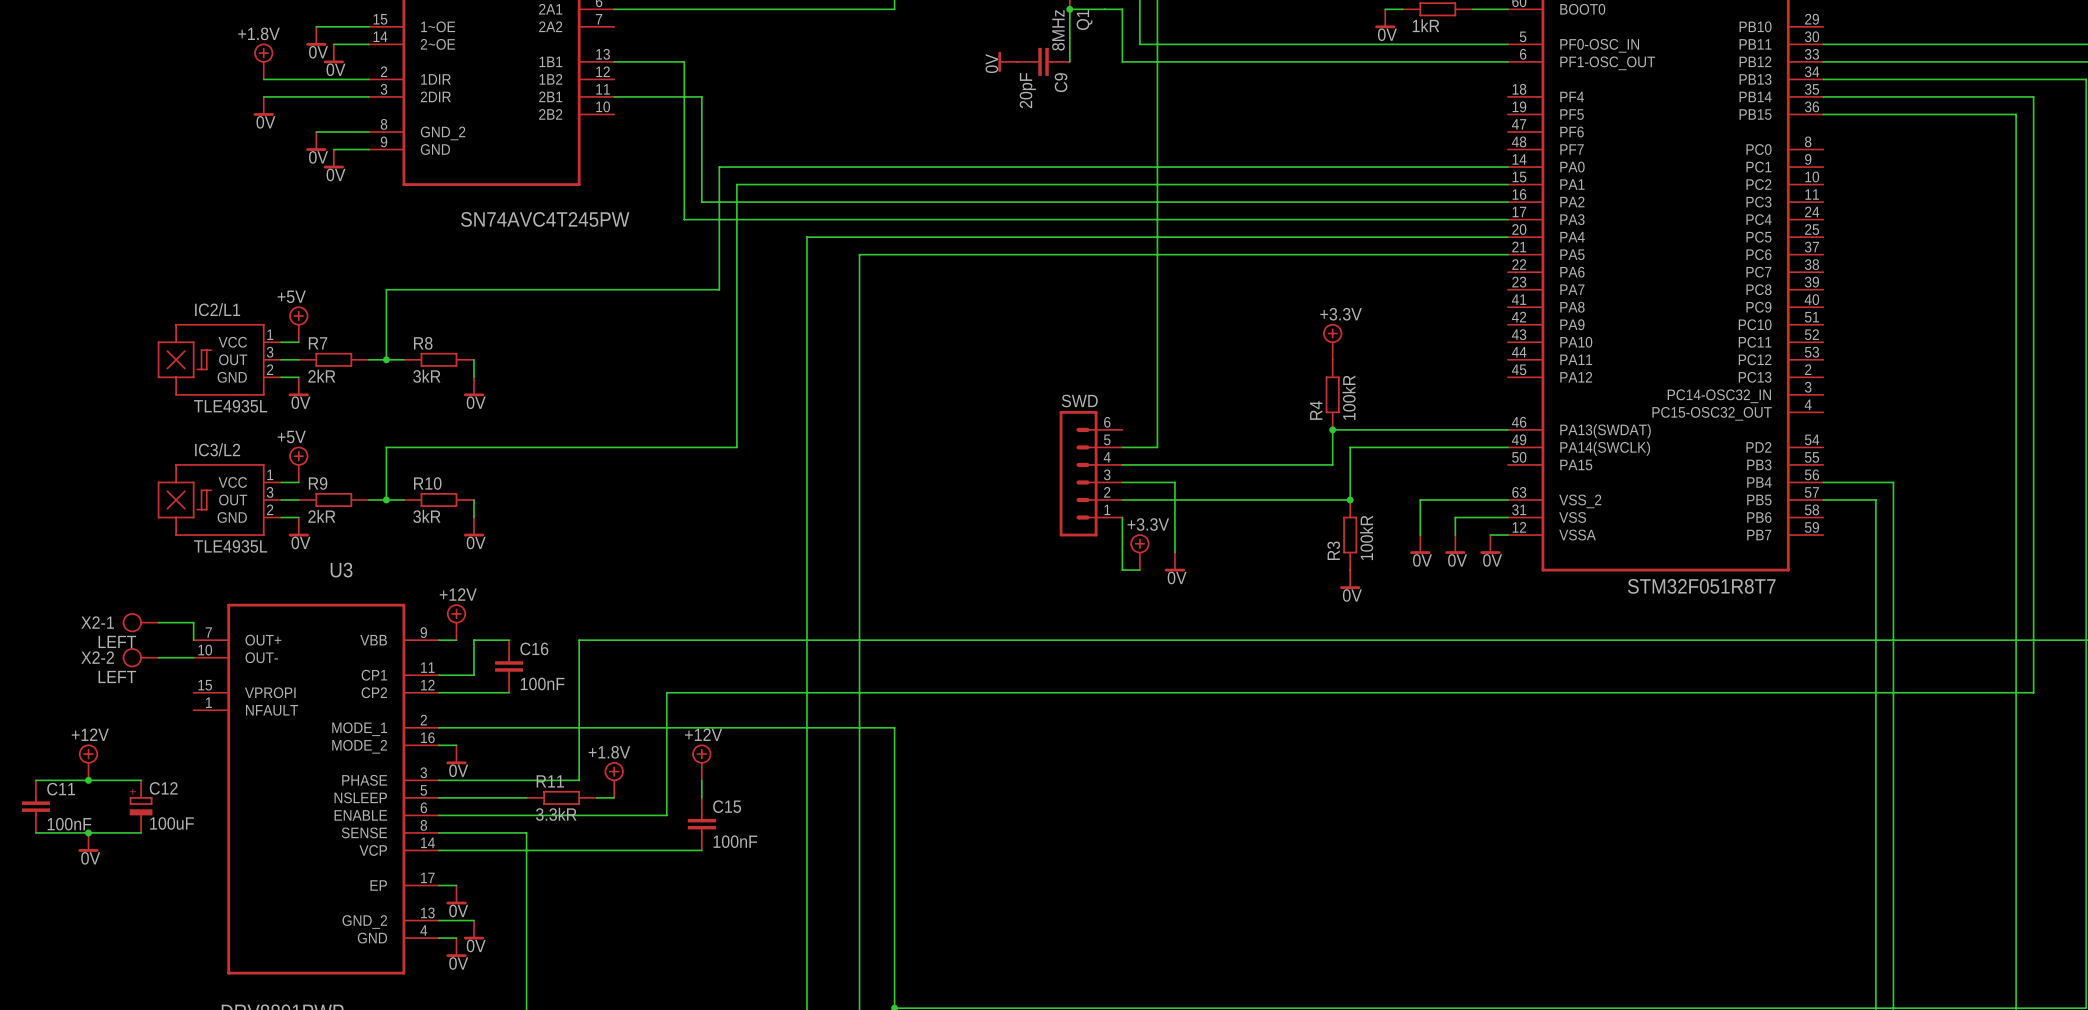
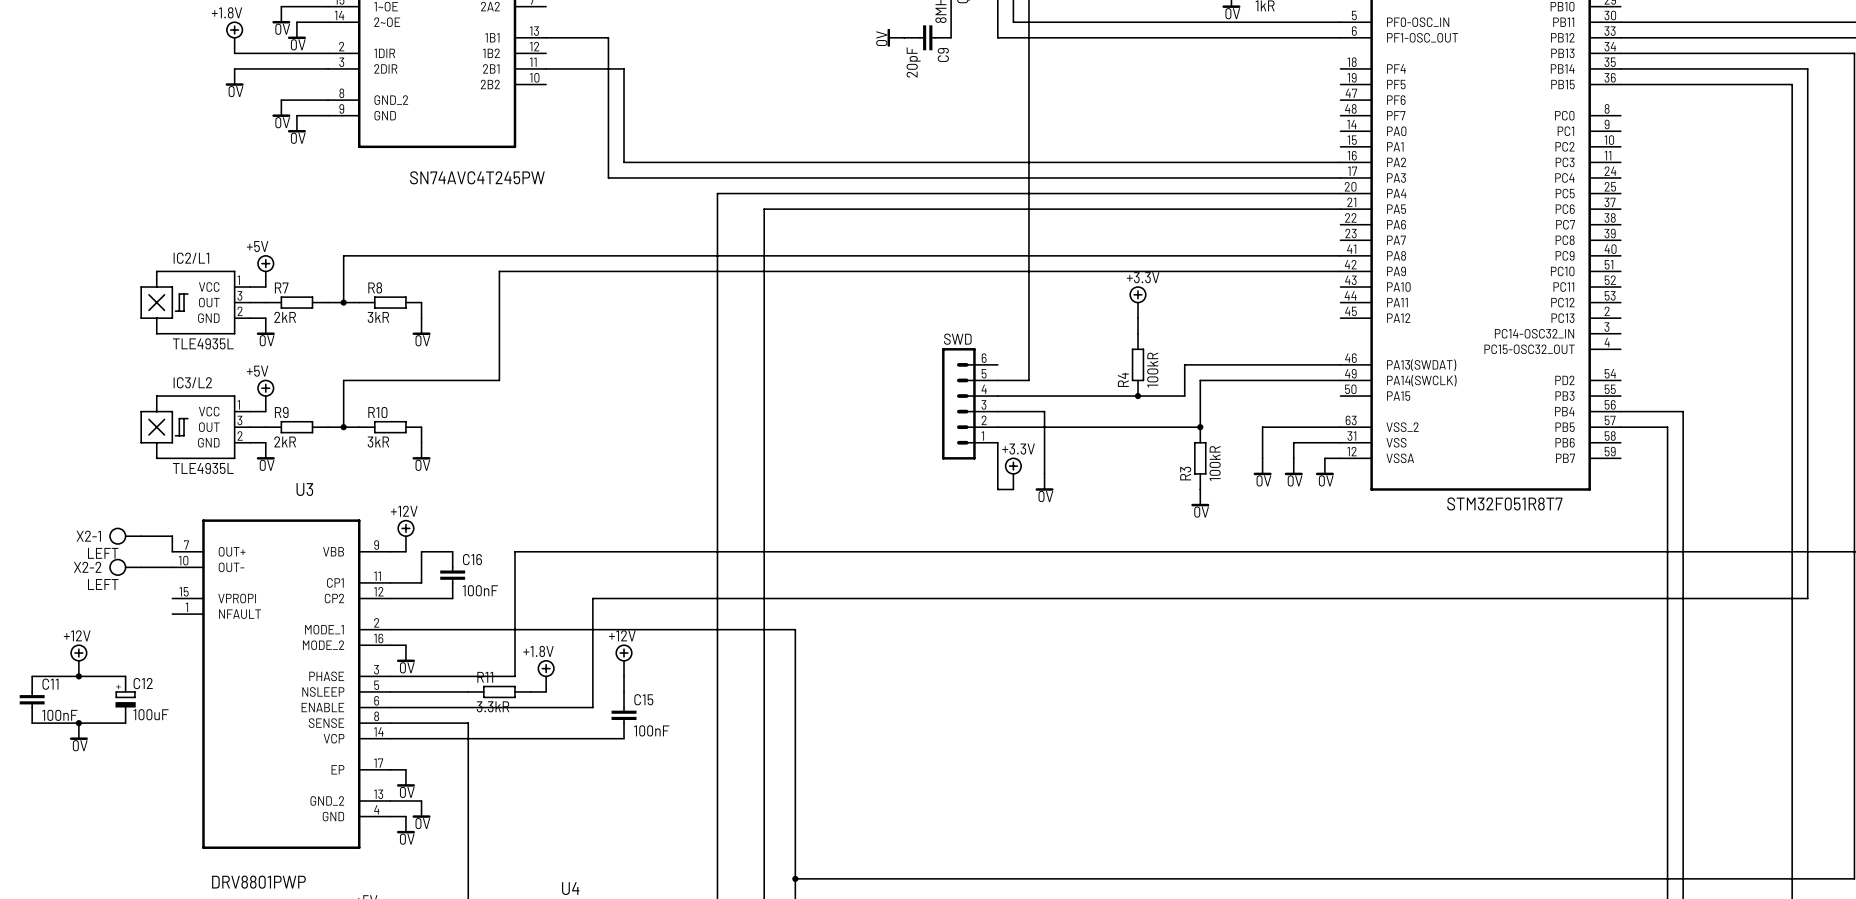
wire: (1507, 167) (719, 167) (719, 289) (386, 289) (386, 307) -> (1340, 255) (343, 255)
wire: (1507, 184) (736, 184) (736, 447) (561, 447) -> (1340, 271) (499, 271) (499, 380)
power symbol position: +3.3V (1332, 341) -> +3.3V (1137, 302)
wire: none -> (1137, 318) (1137, 333)
R4 position: (1332, 394) -> (1137, 364)
junction: (1332, 429) -> none
junction: none -> (1137, 396)

